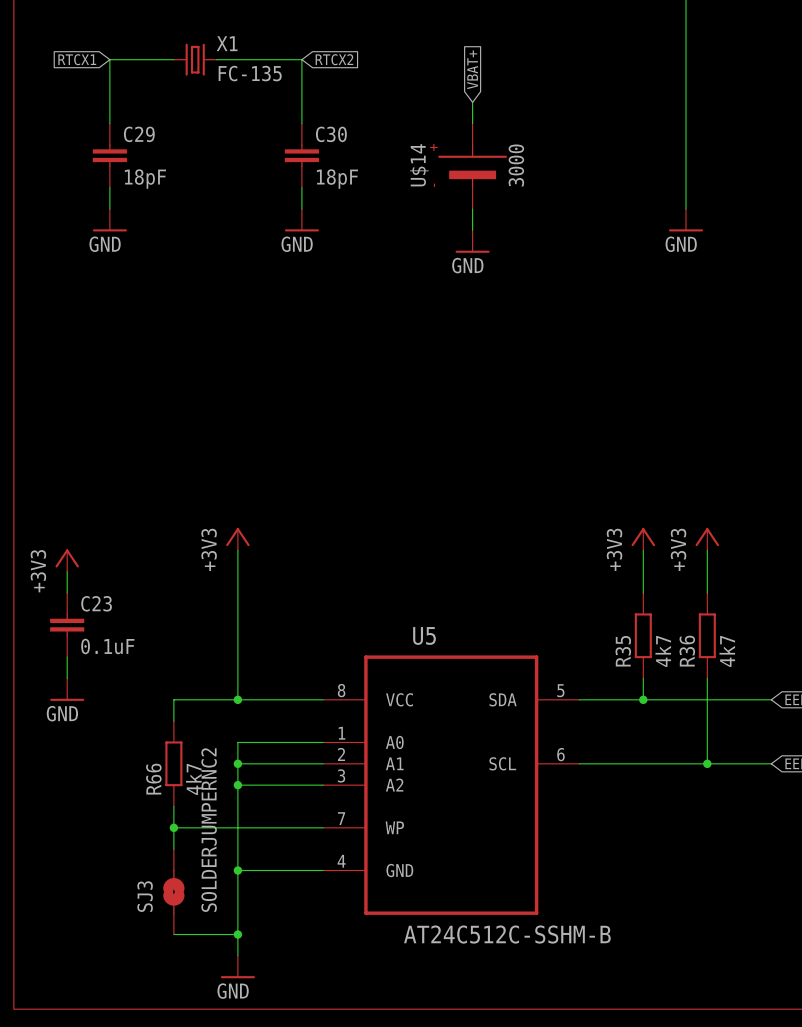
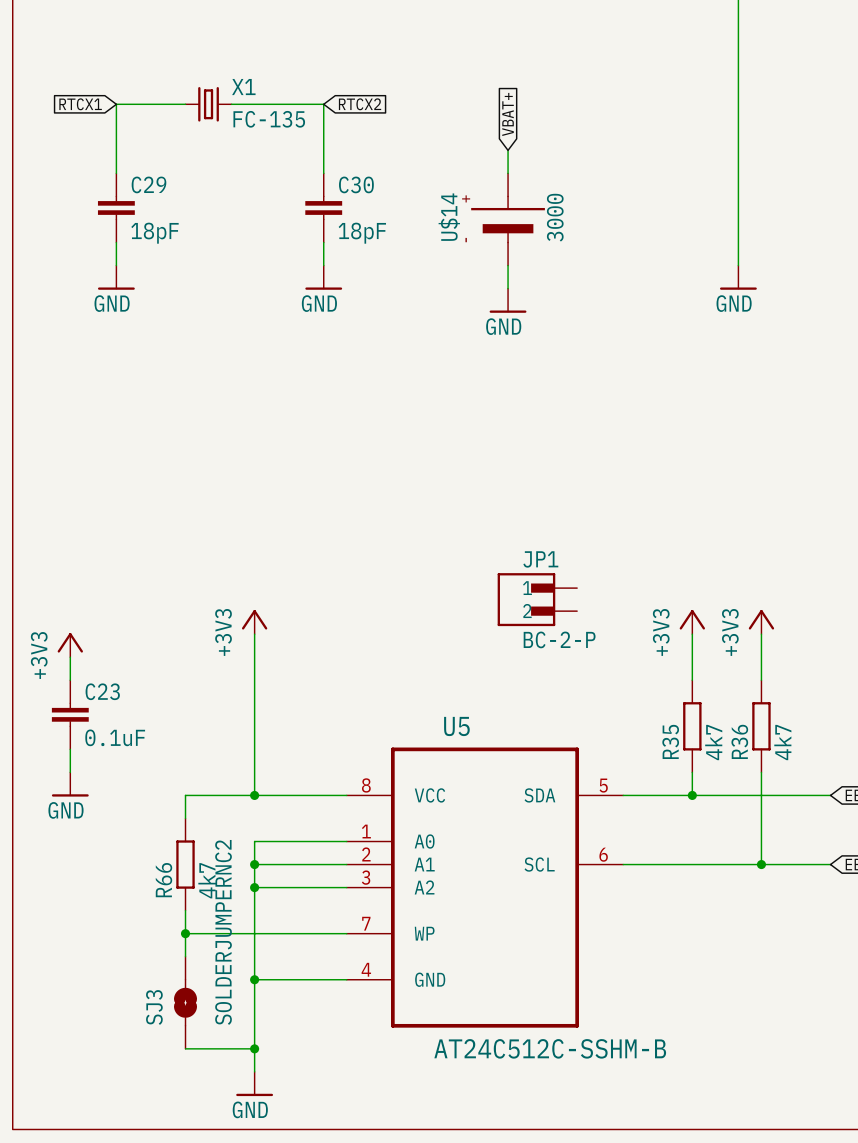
JP1: none -> BC-2-P (537, 599)

